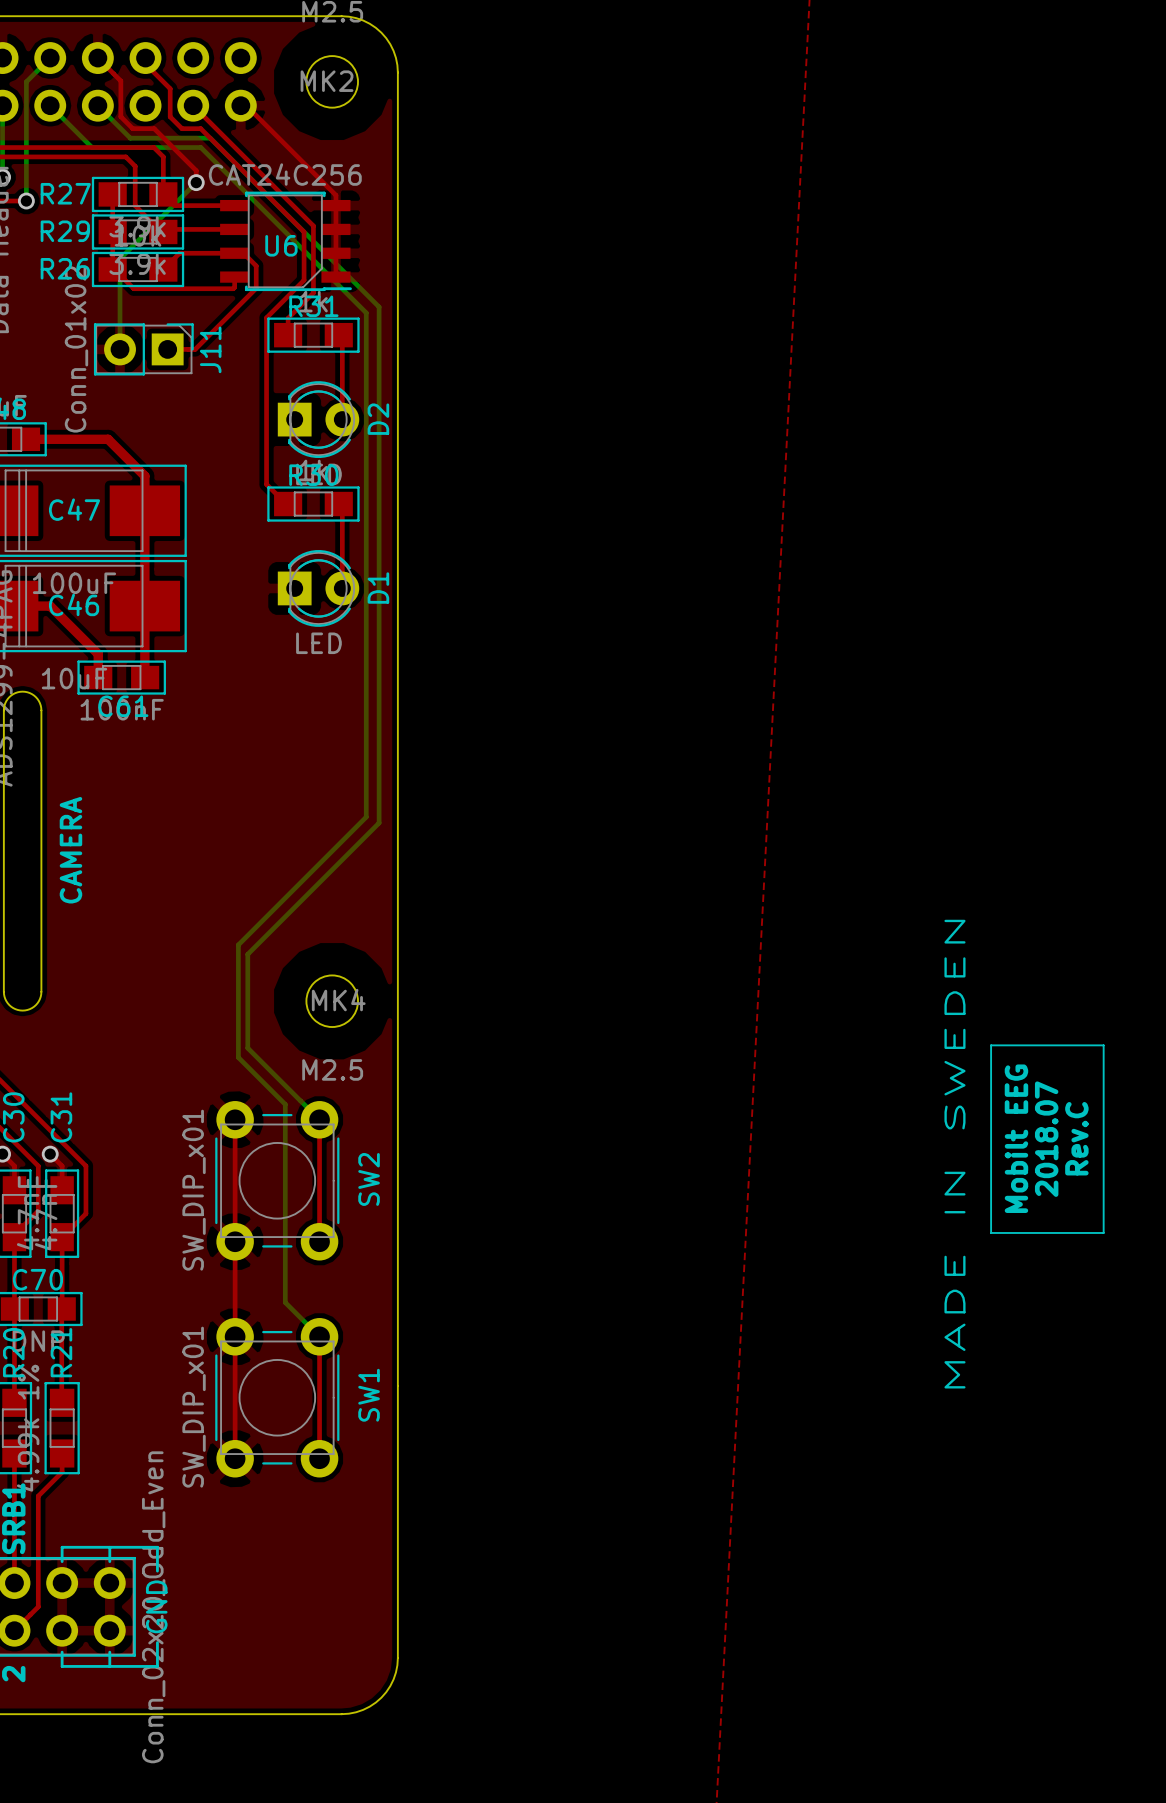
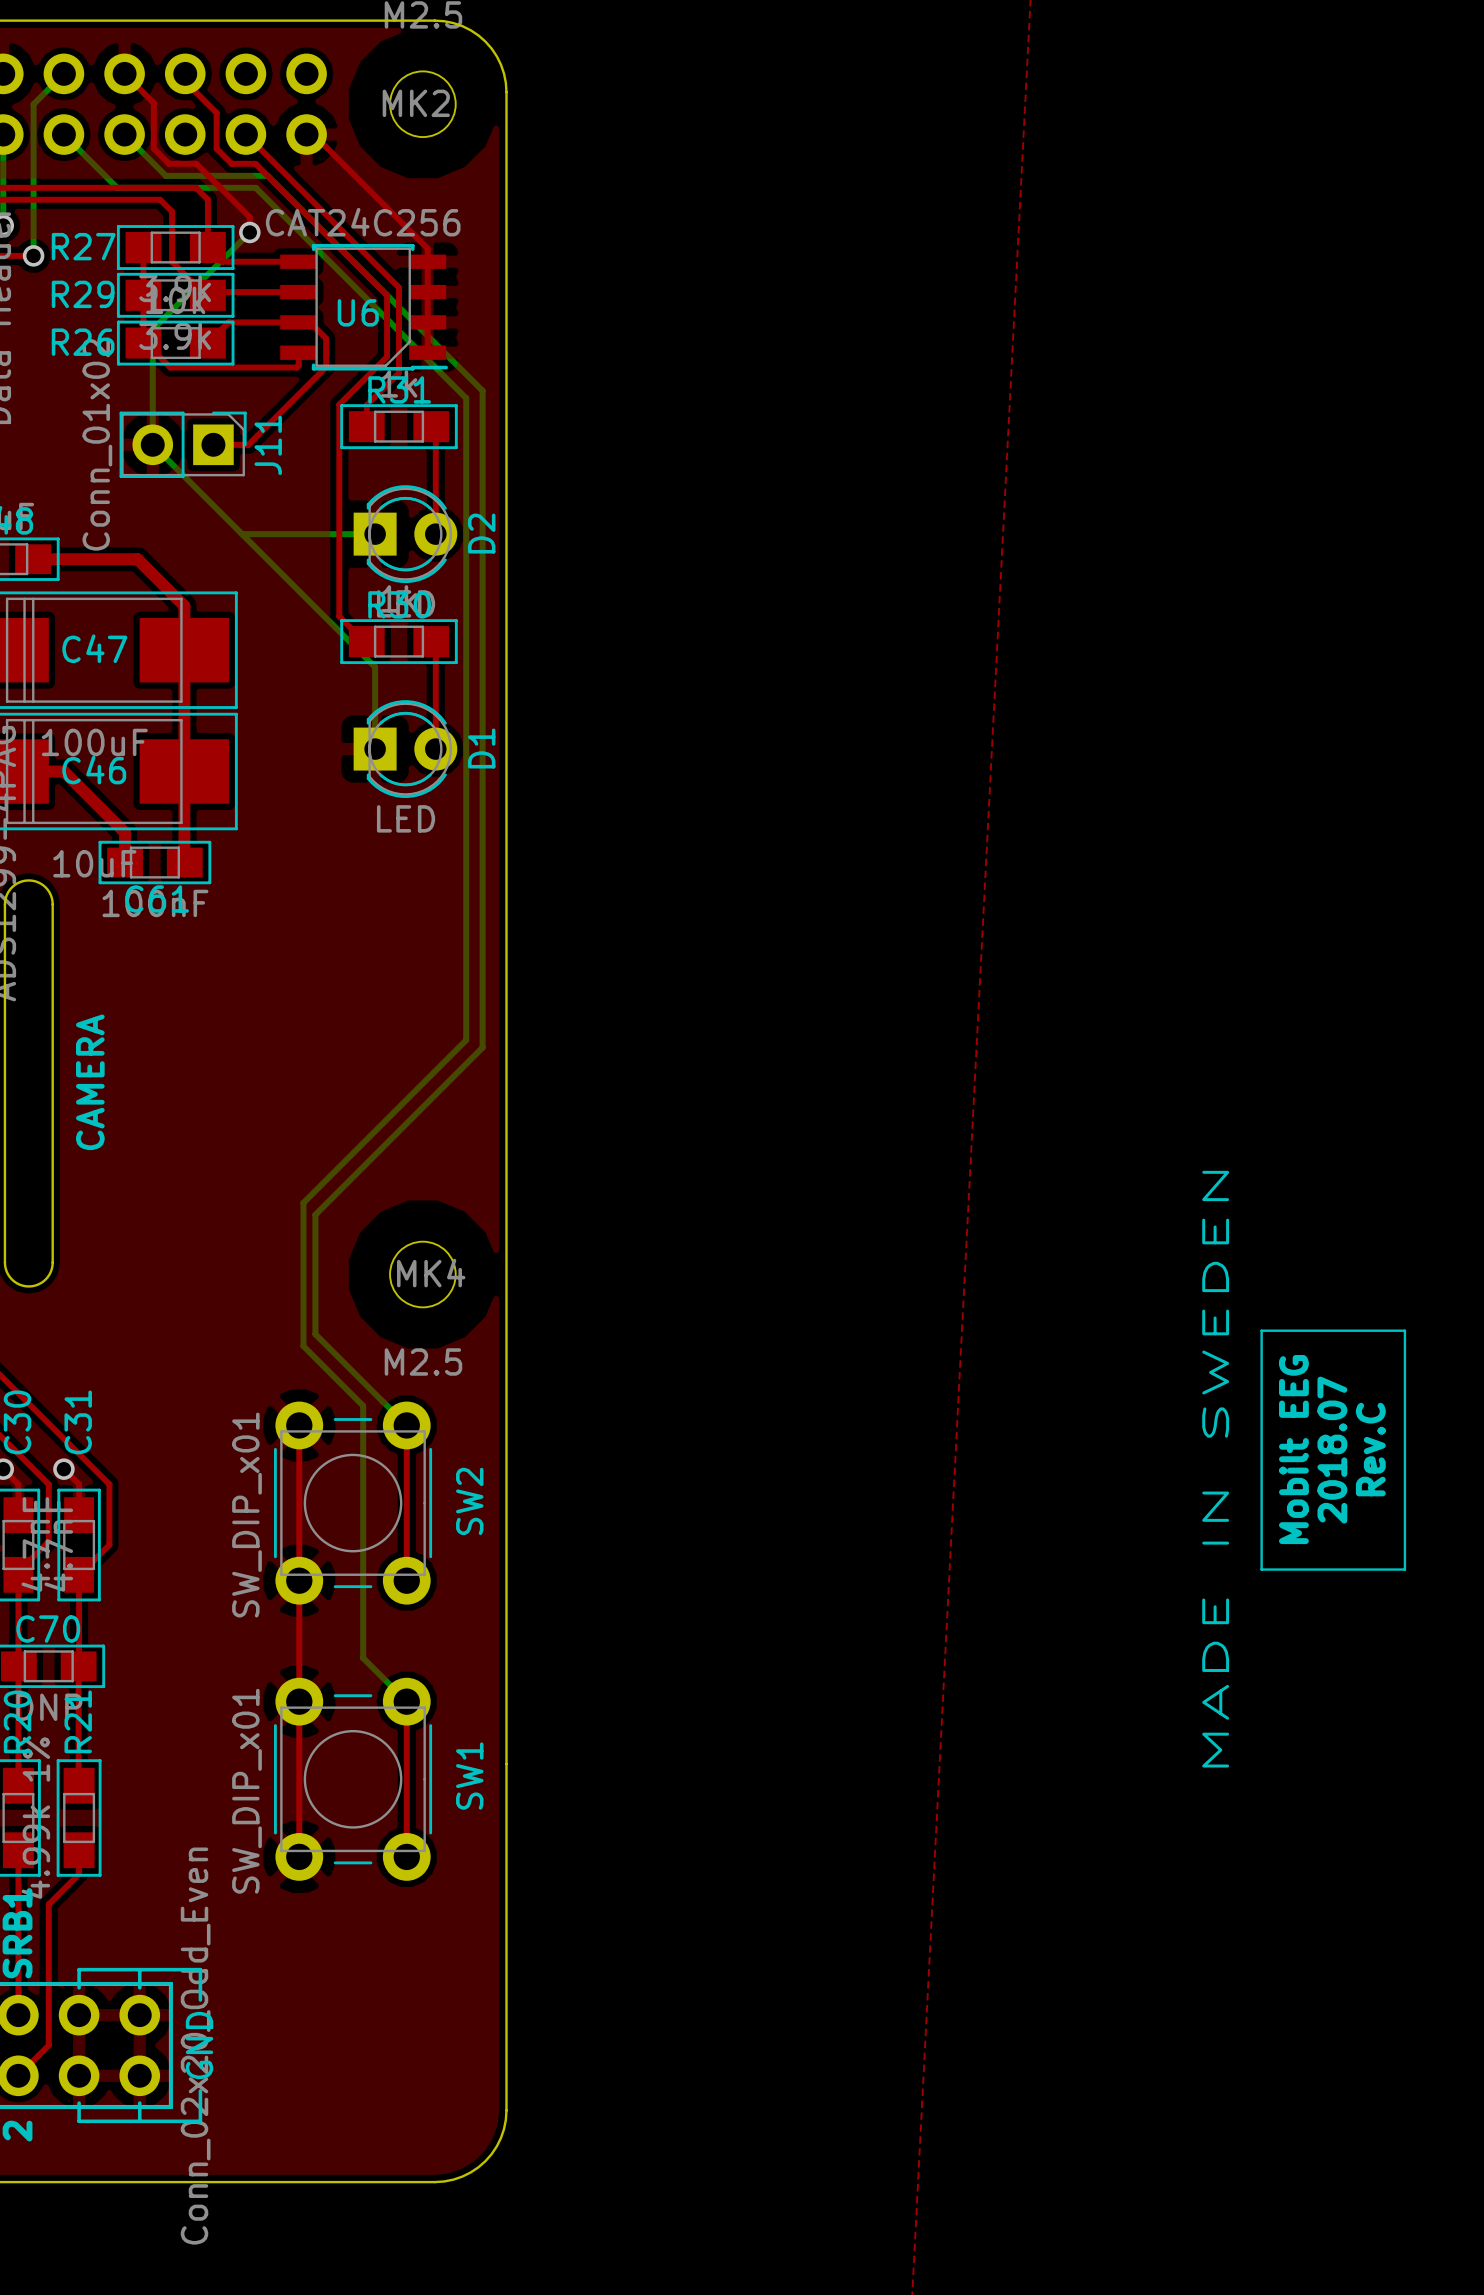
bottom track: none -> (152, 444) (375, 667) (375, 749)
bottom track: none -> (242, 534) (375, 534)

